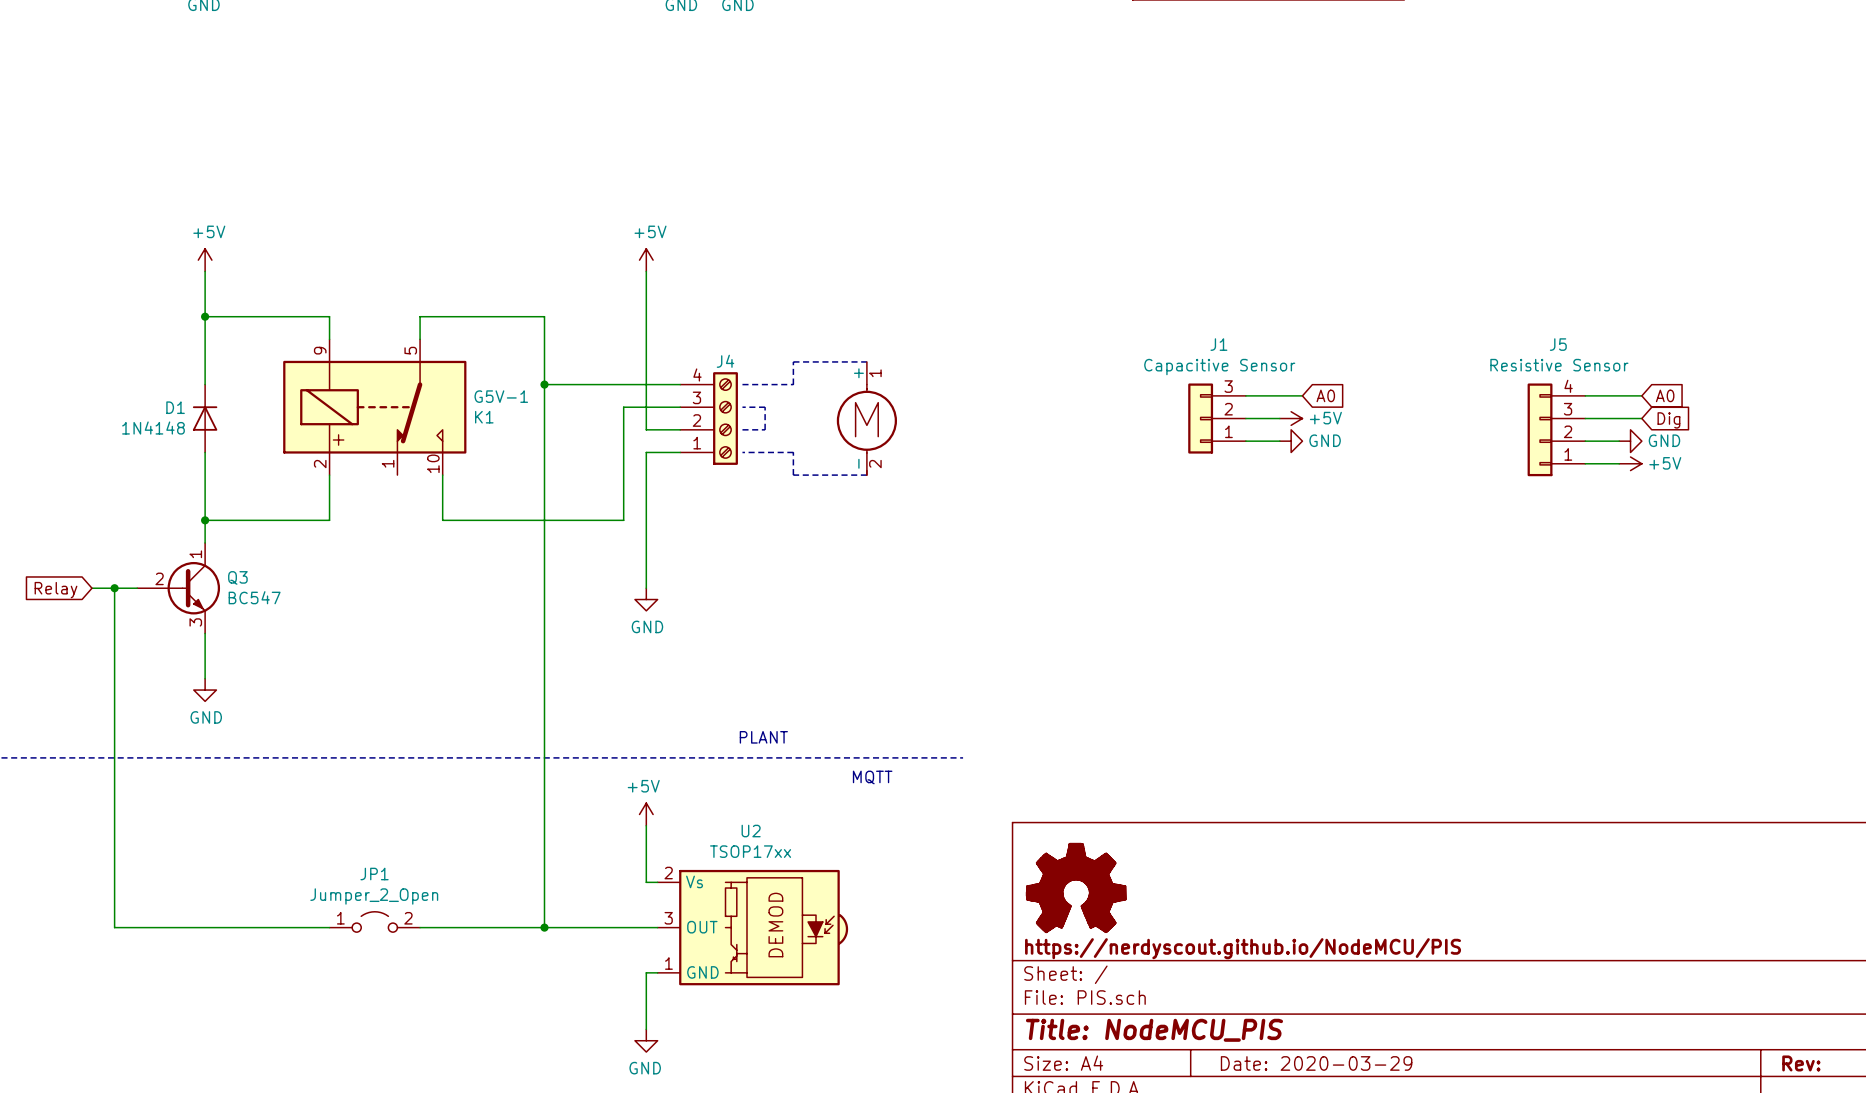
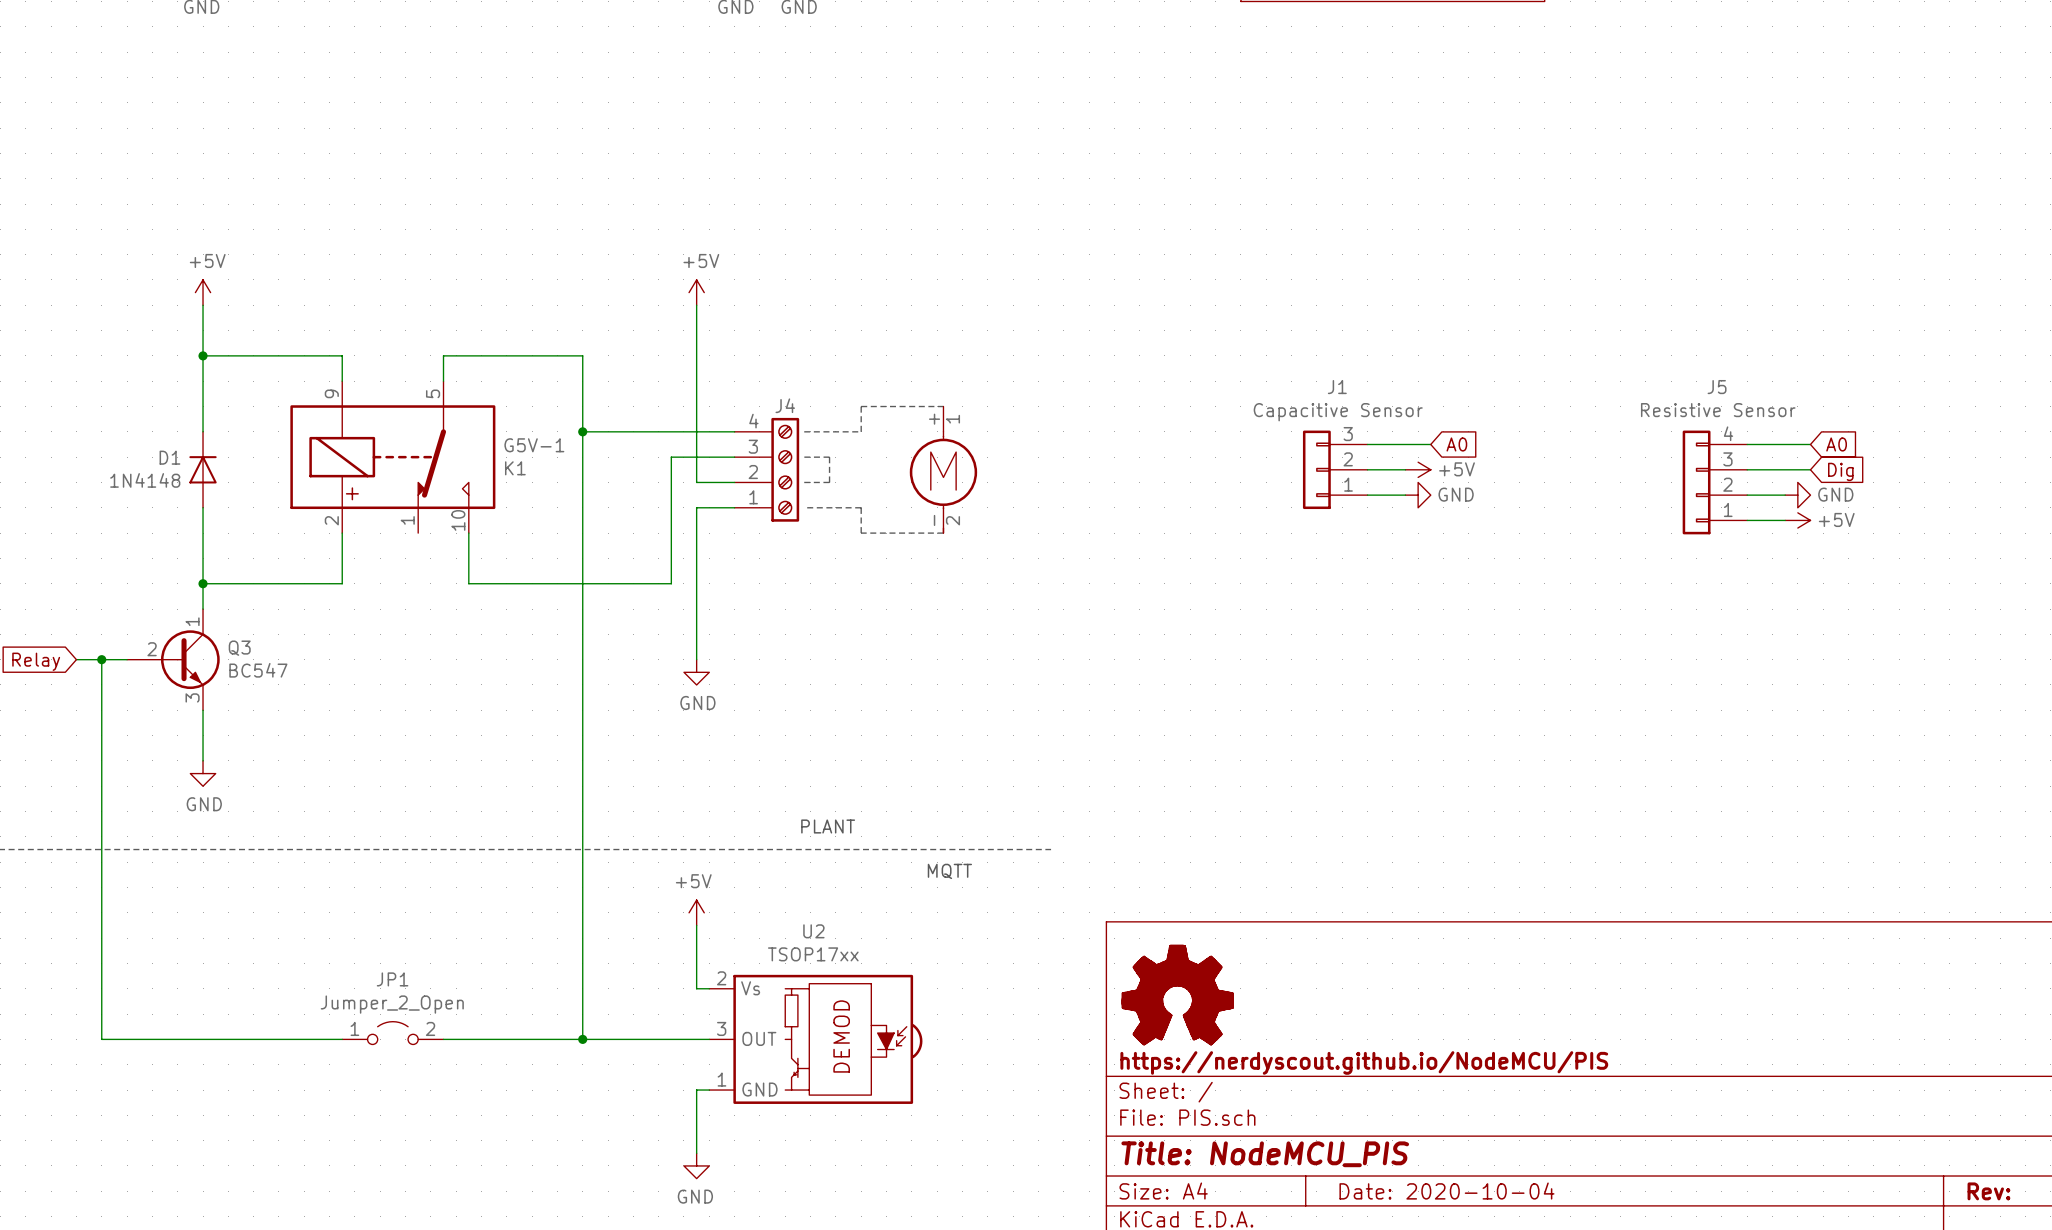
title block: Date: 2020-03-29 (1316, 1063) -> Date: 2020-10-04 (1446, 1191)

